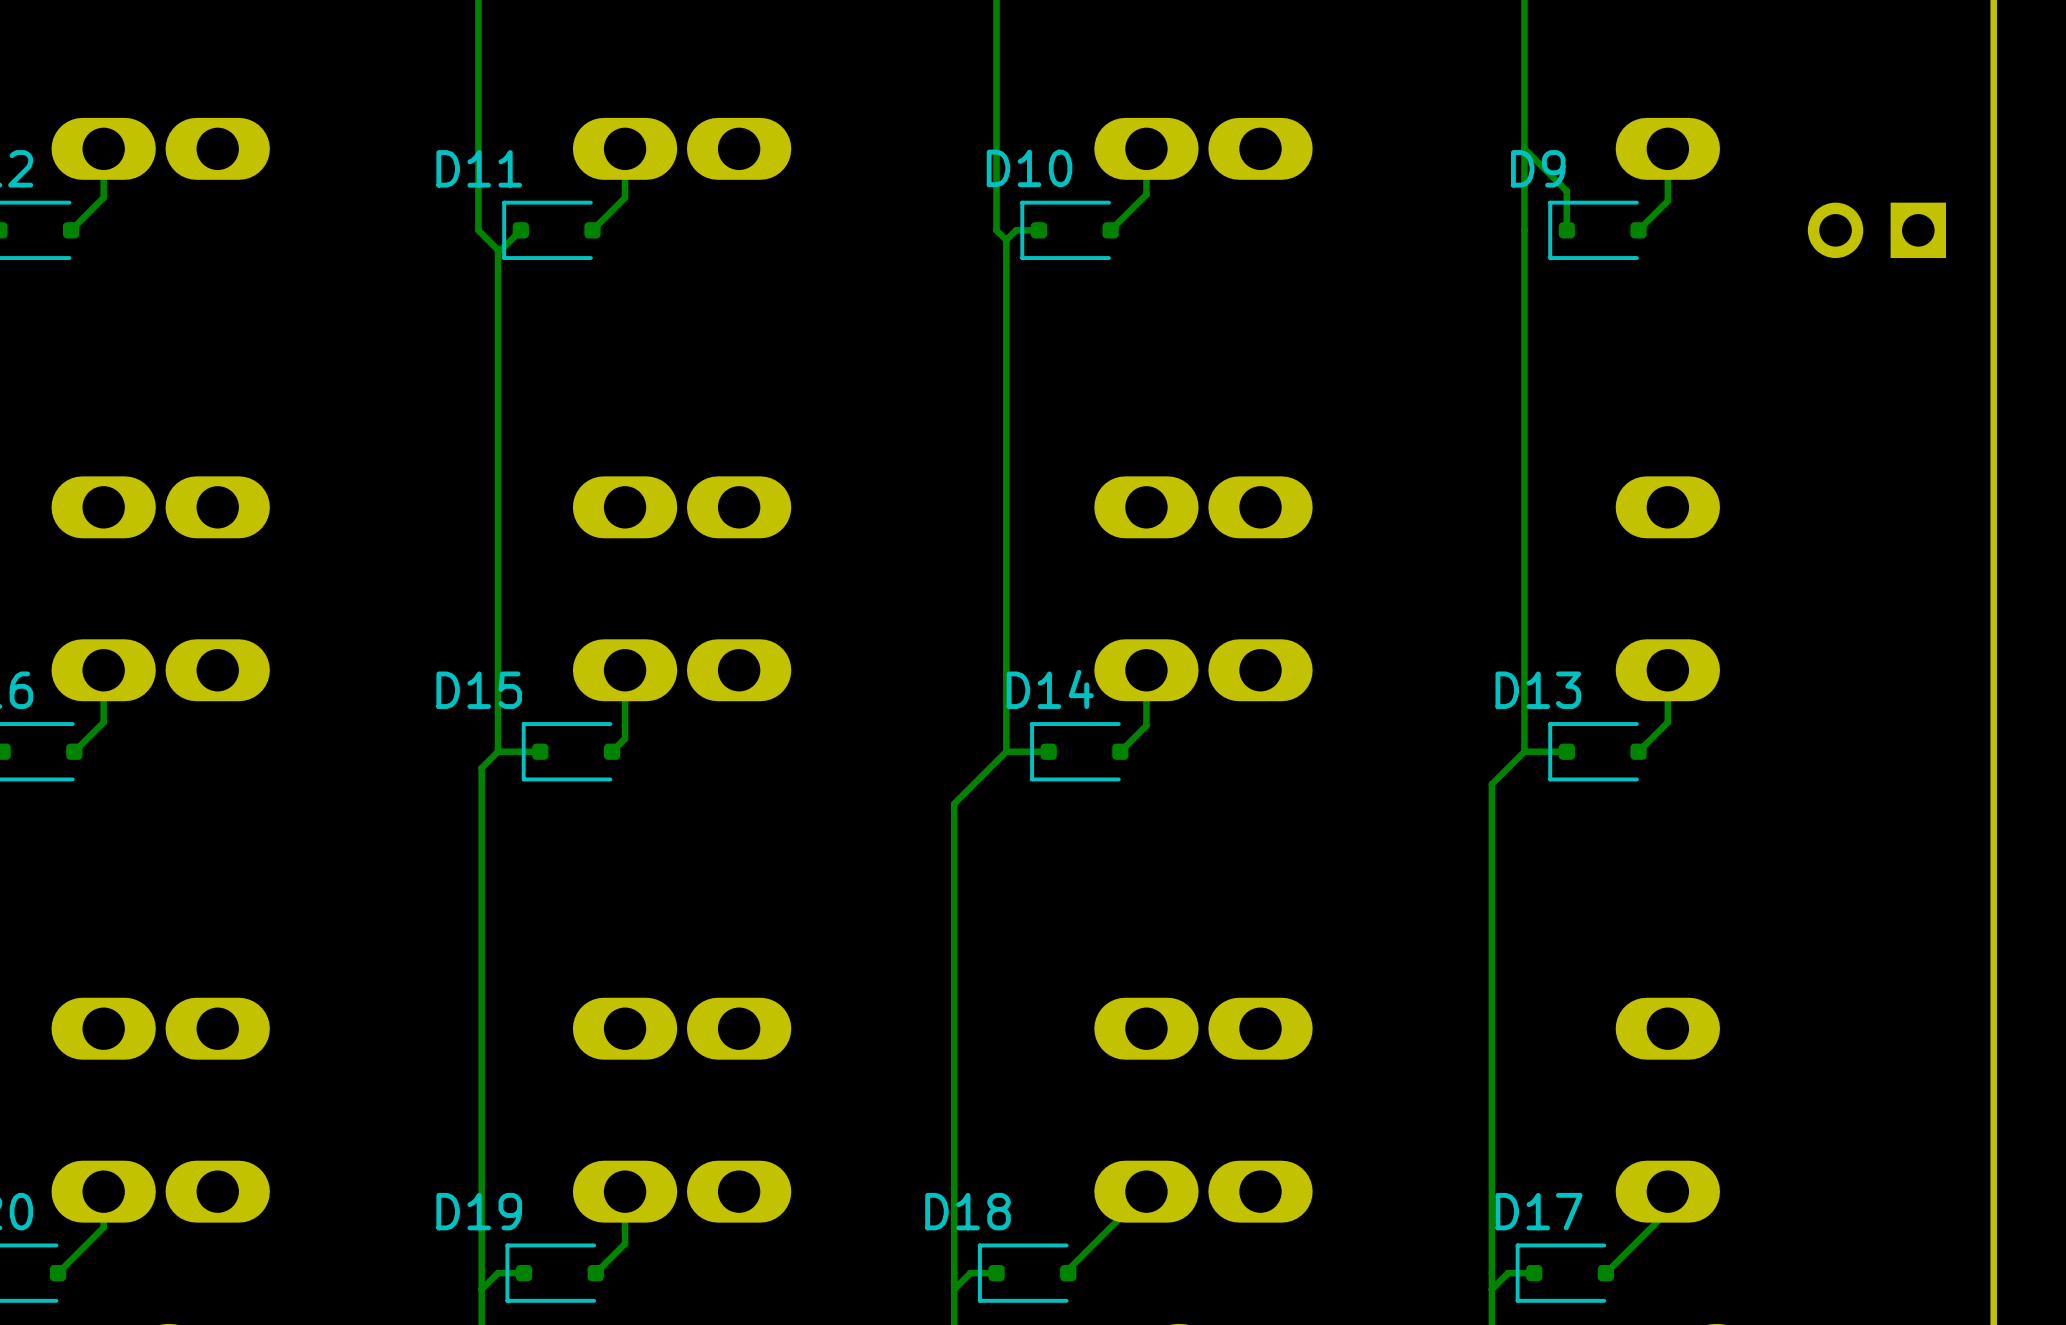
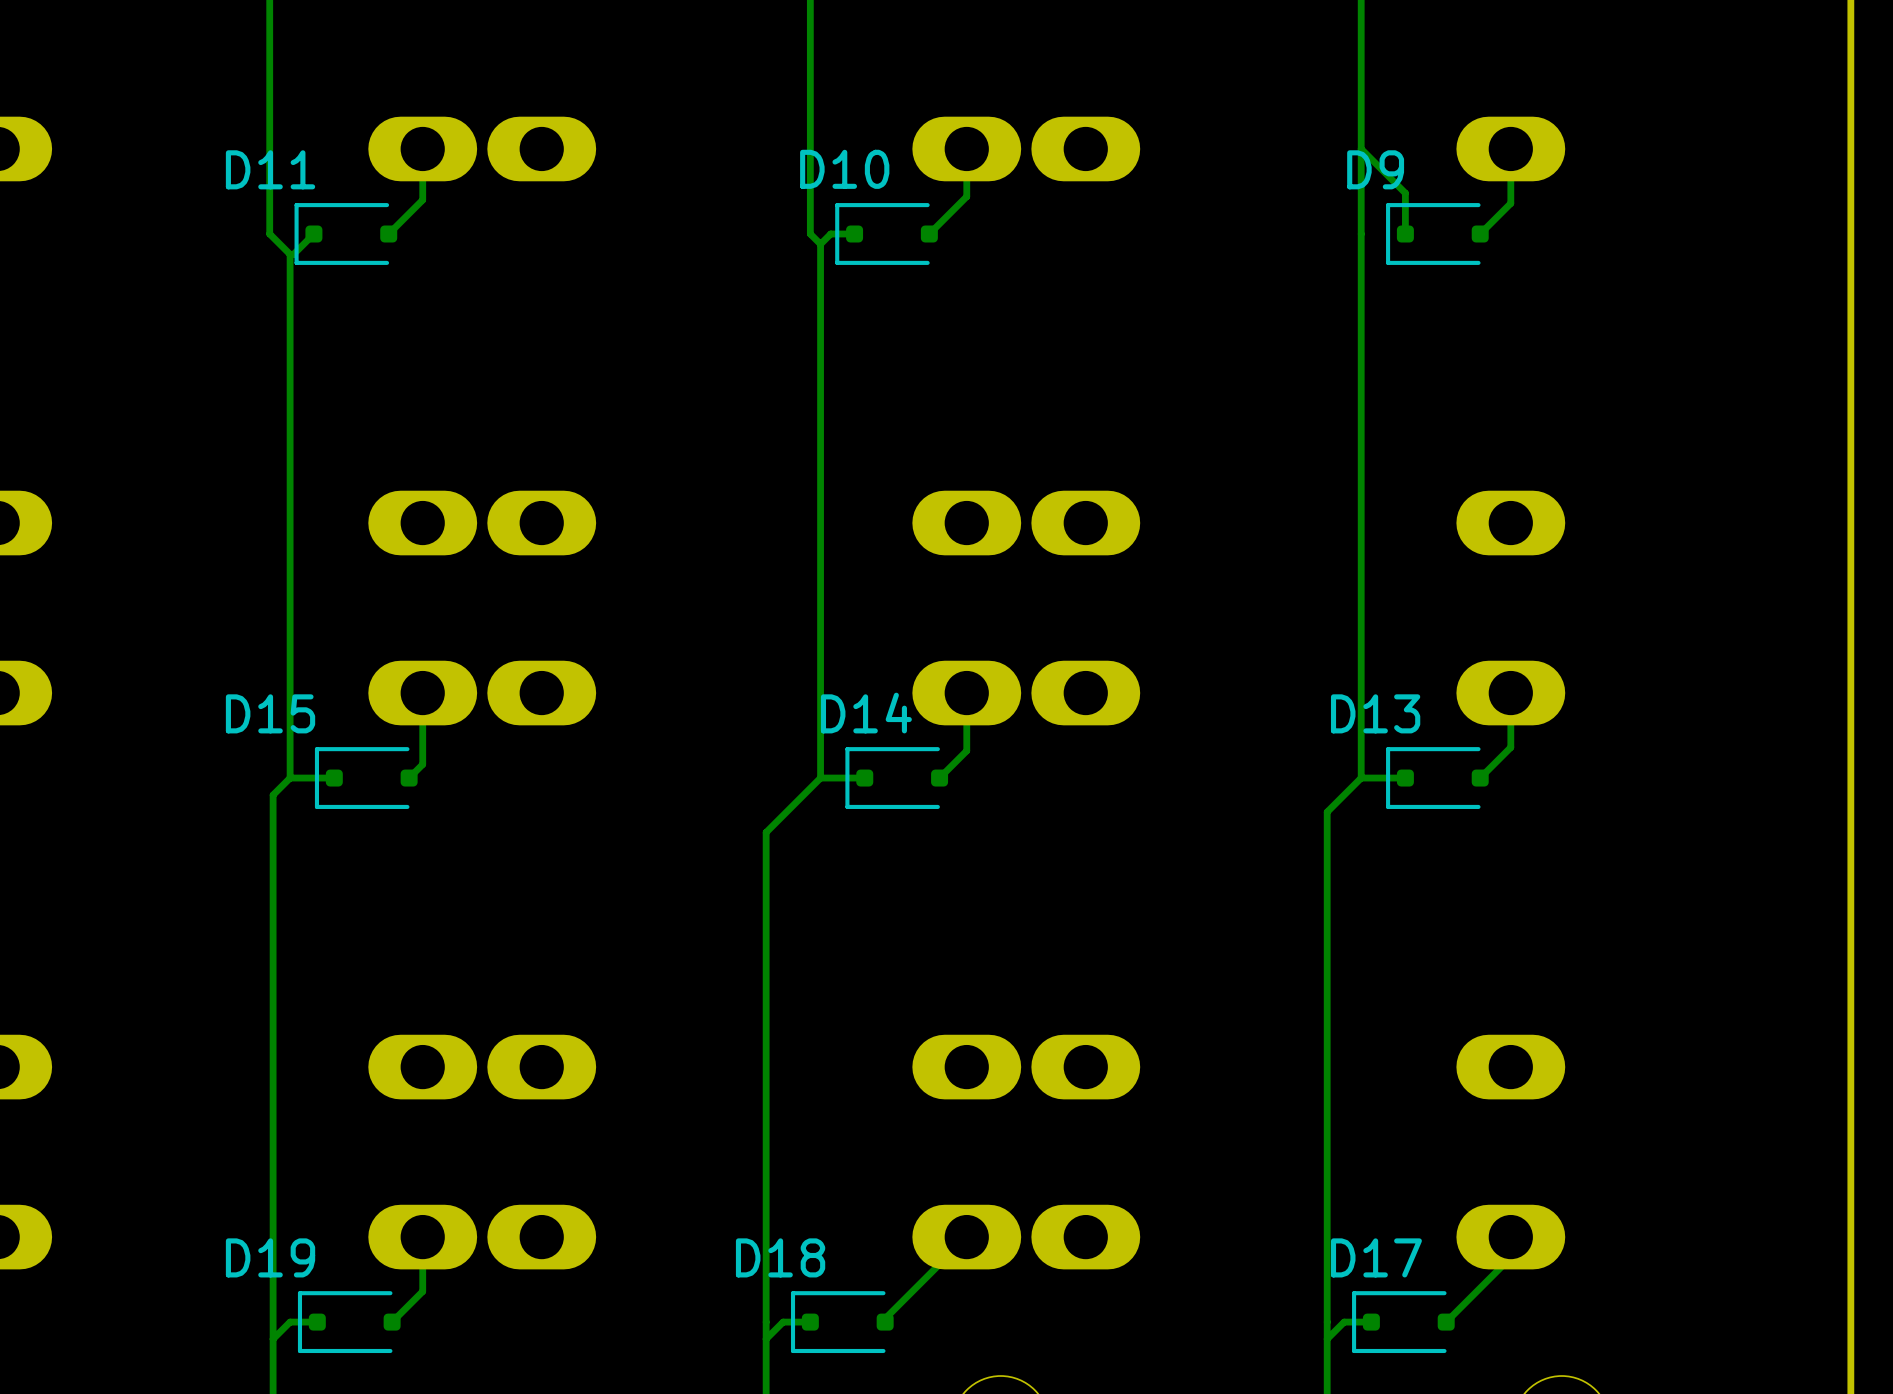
part: (1876, 230) -> none

